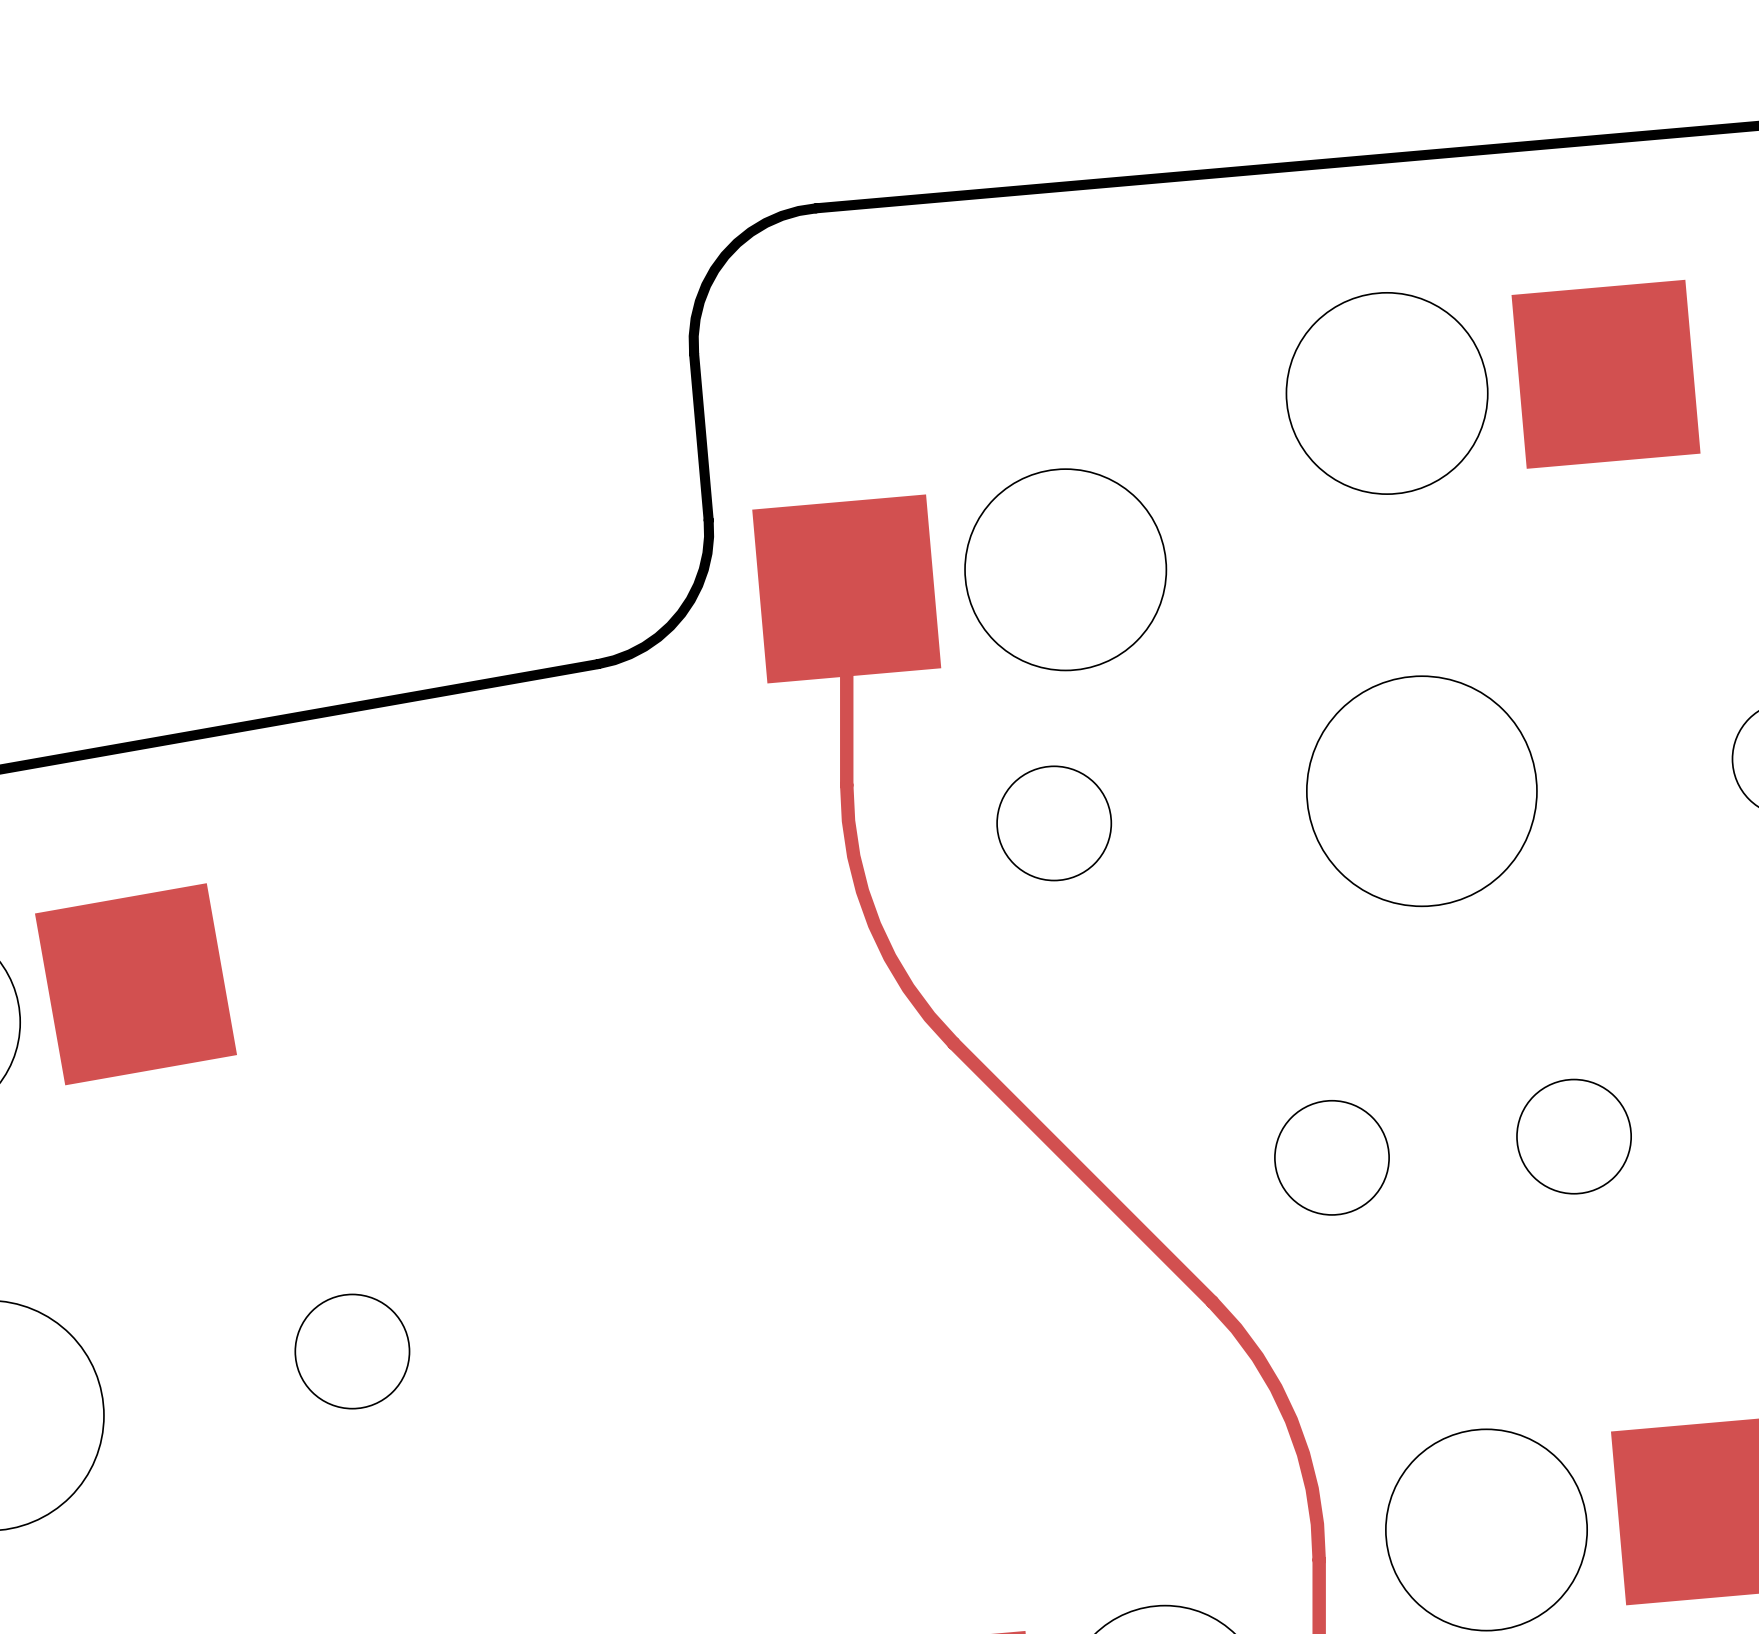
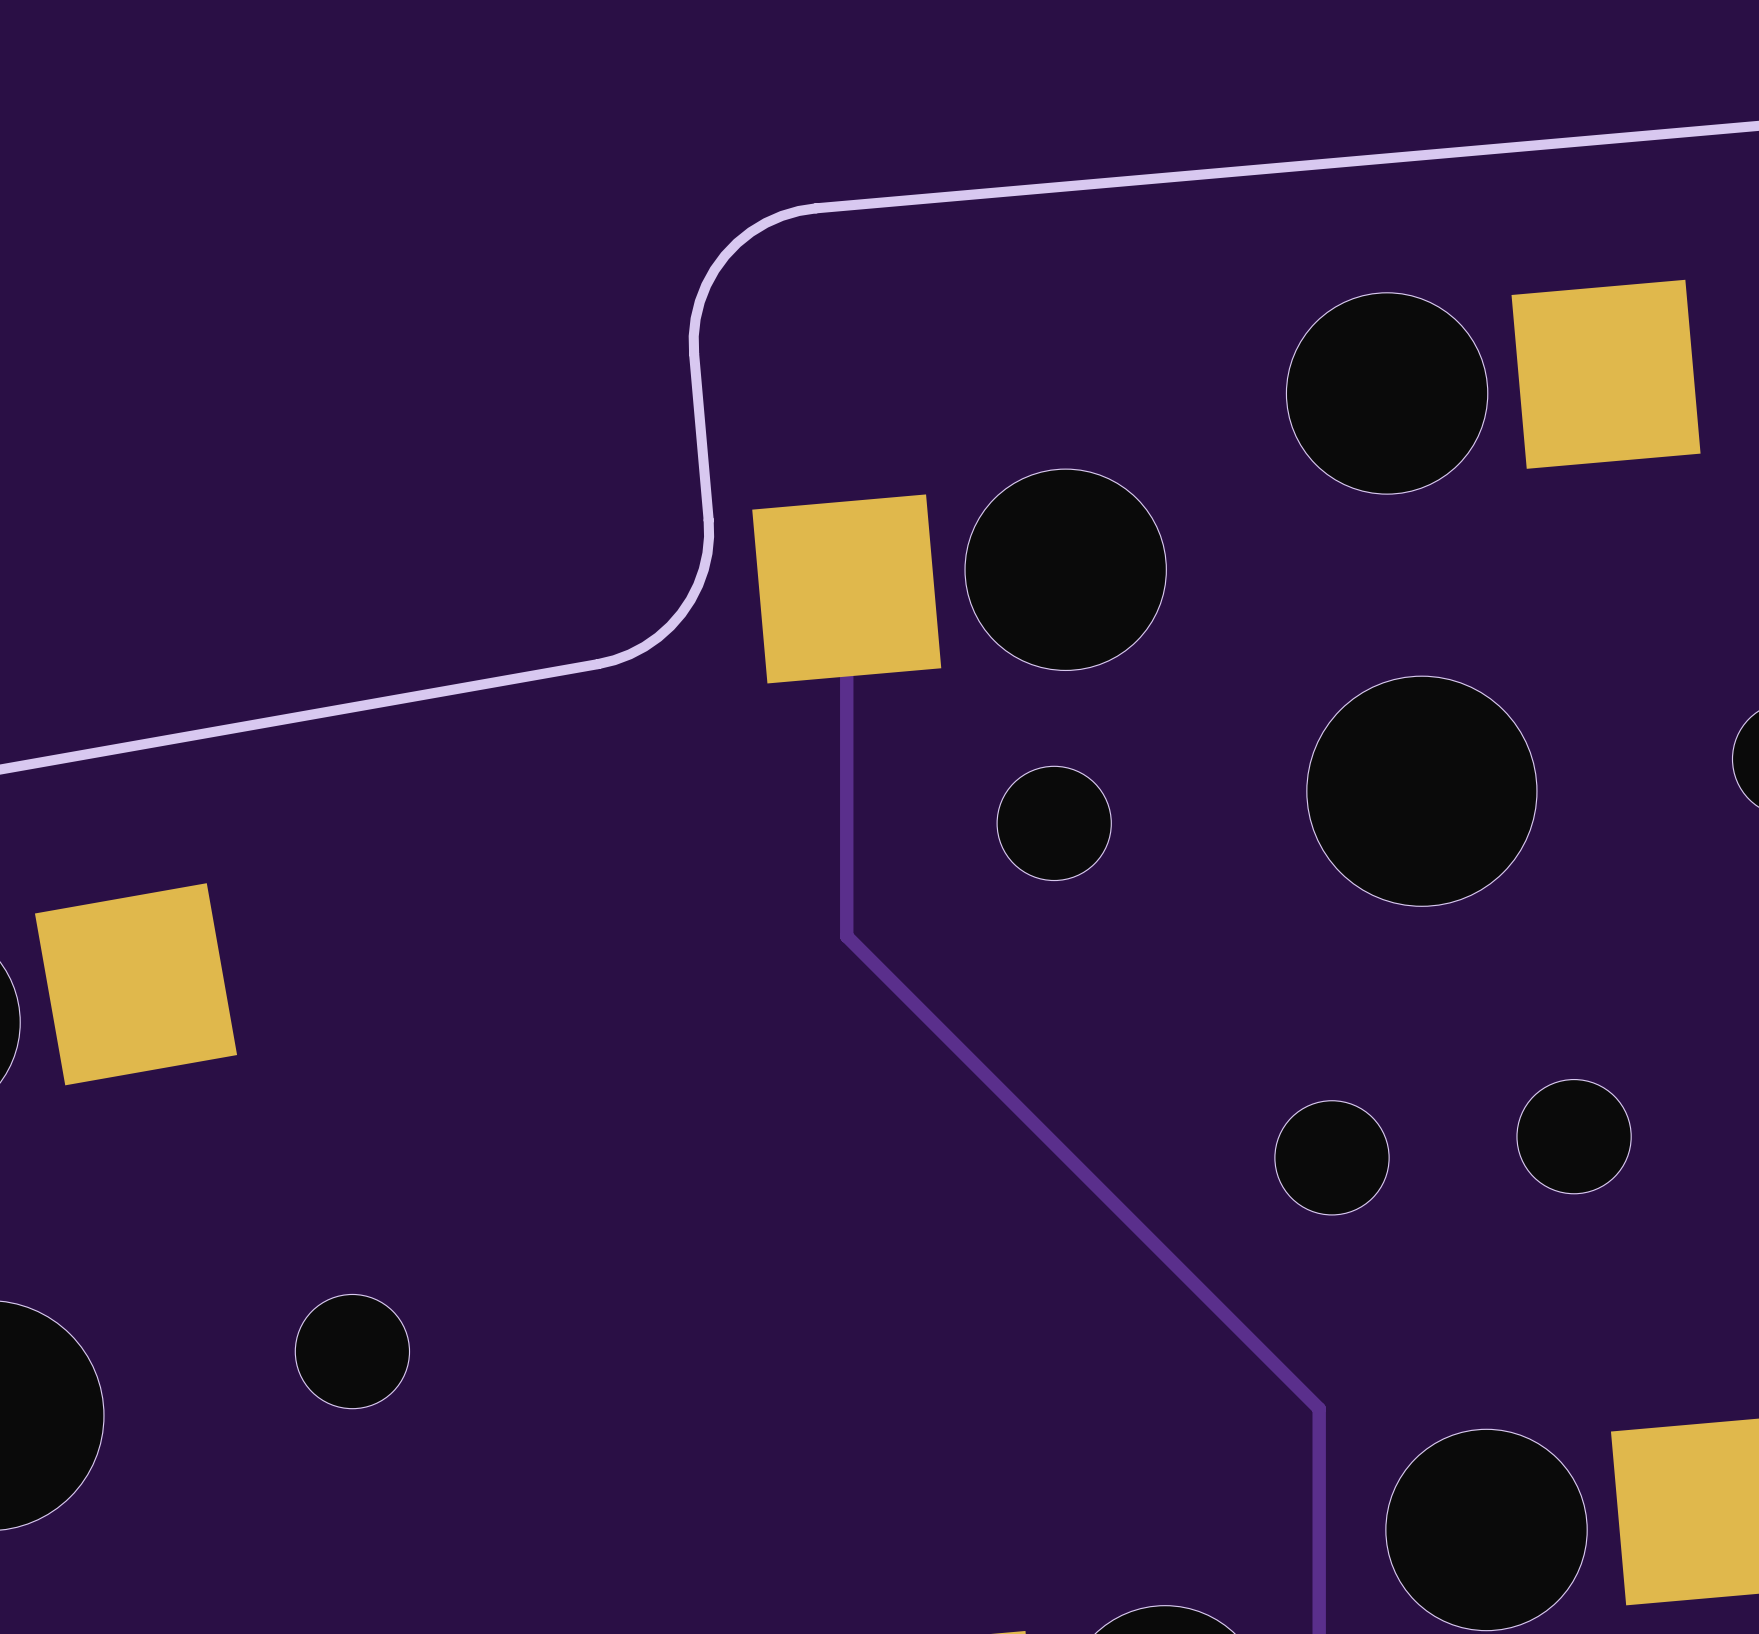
track: (846, 785) (848, 820) (853, 856) (862, 891) (874, 924) (889, 957) (908, 987) (929, 1016) (953, 1043) -> (846, 785) (846, 936) (953, 1043)
track: (1212, 1301) (1236, 1328) (1257, 1357) (1276, 1387) (1291, 1420) (1303, 1454) (1312, 1488) (1317, 1524) (1319, 1560) -> (1212, 1301) (1319, 1408) (1319, 1560)

